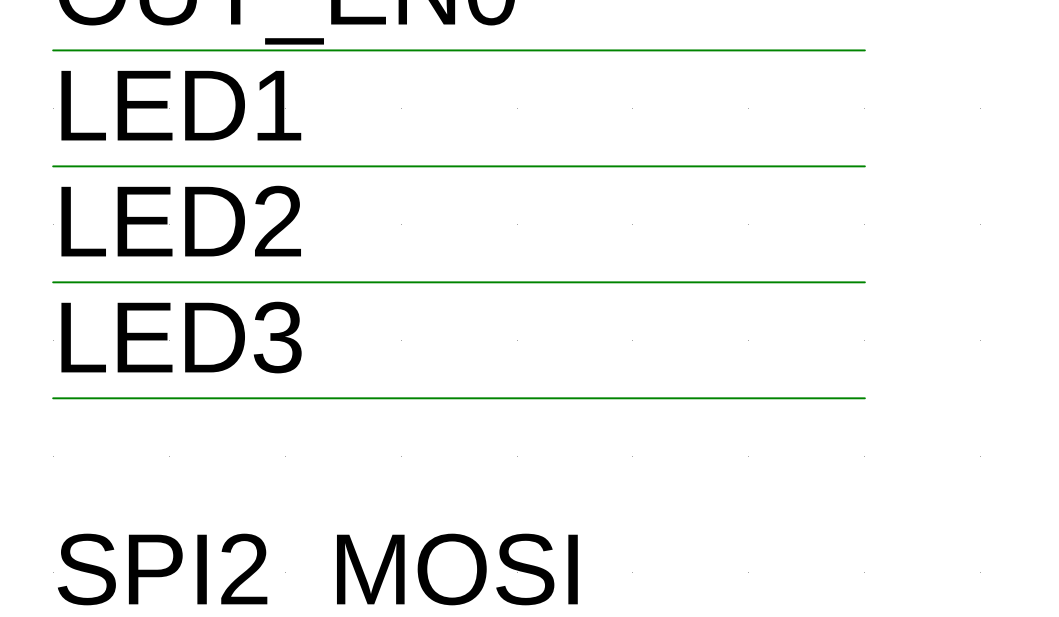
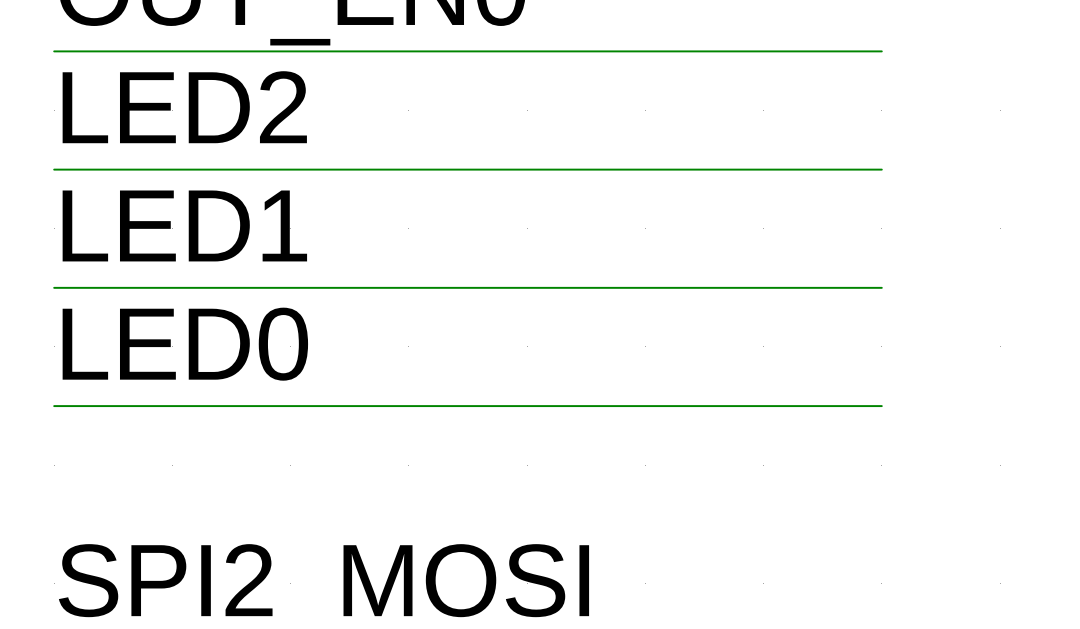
label: LED1 (181, 105) -> LED2 (184, 107)
label: LED2 (181, 221) -> LED1 (184, 225)
label: LED3 (181, 337) -> LED0 (185, 344)

